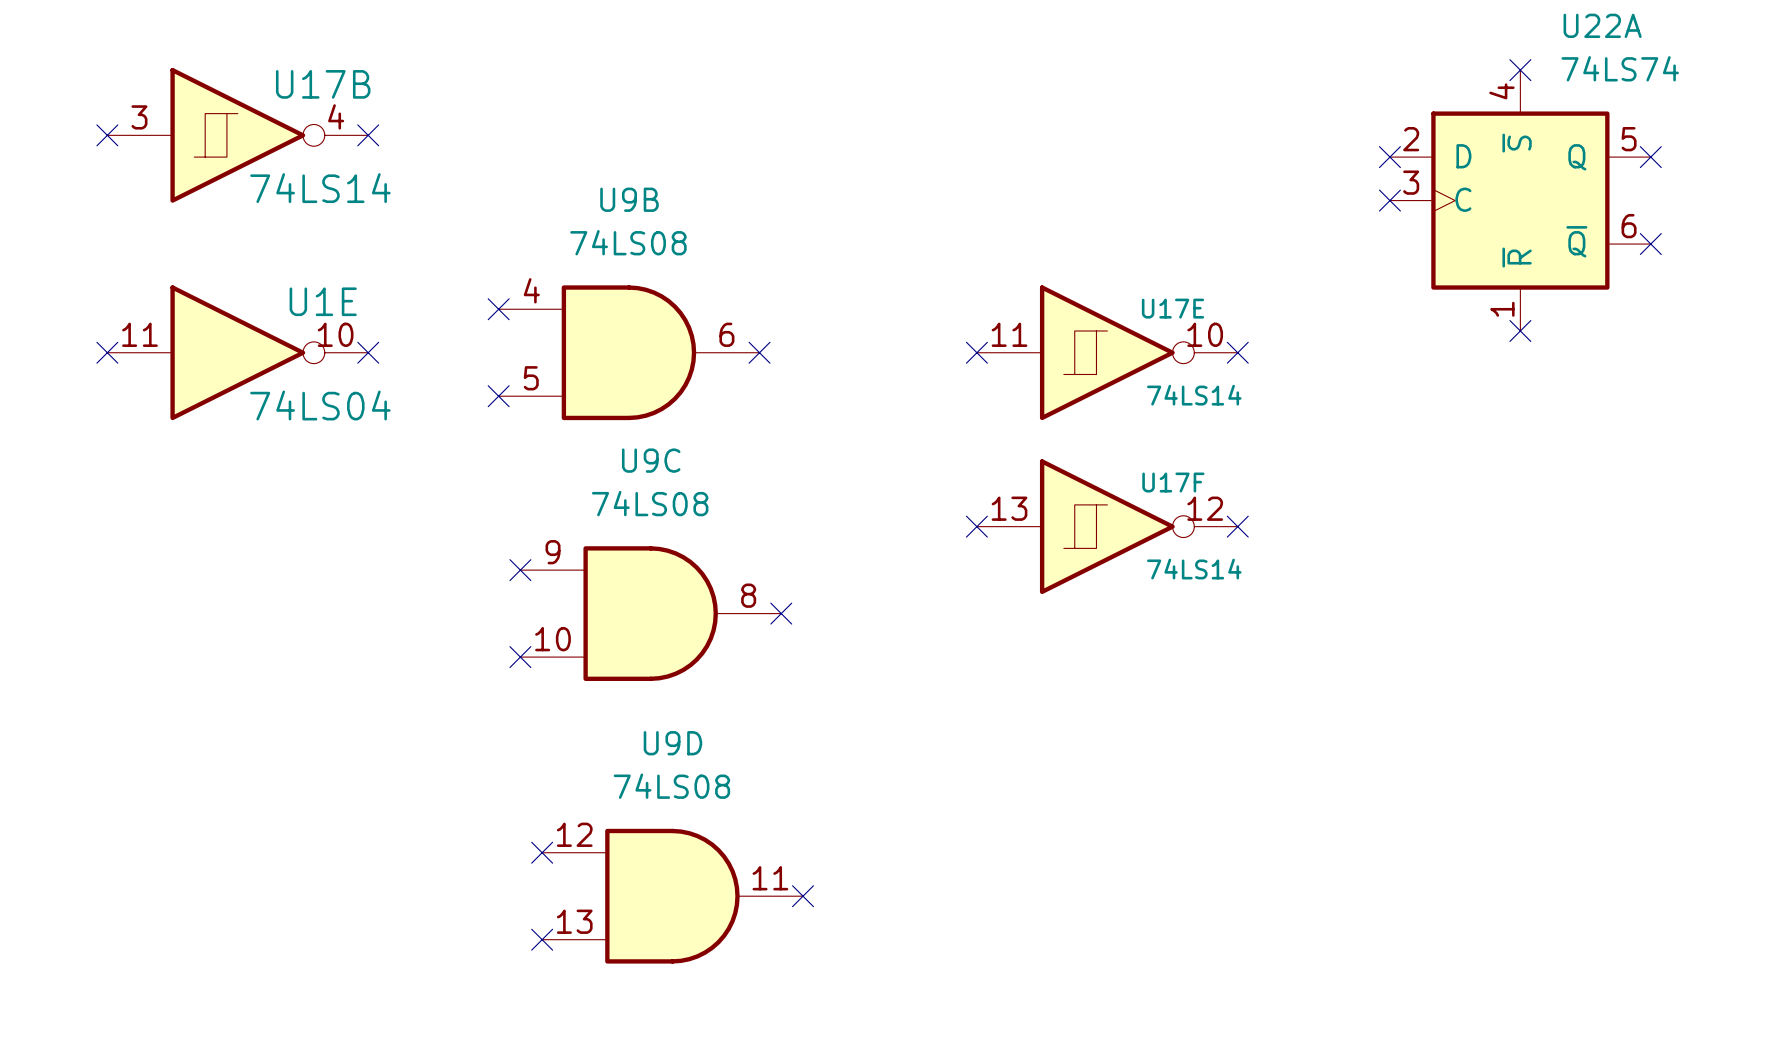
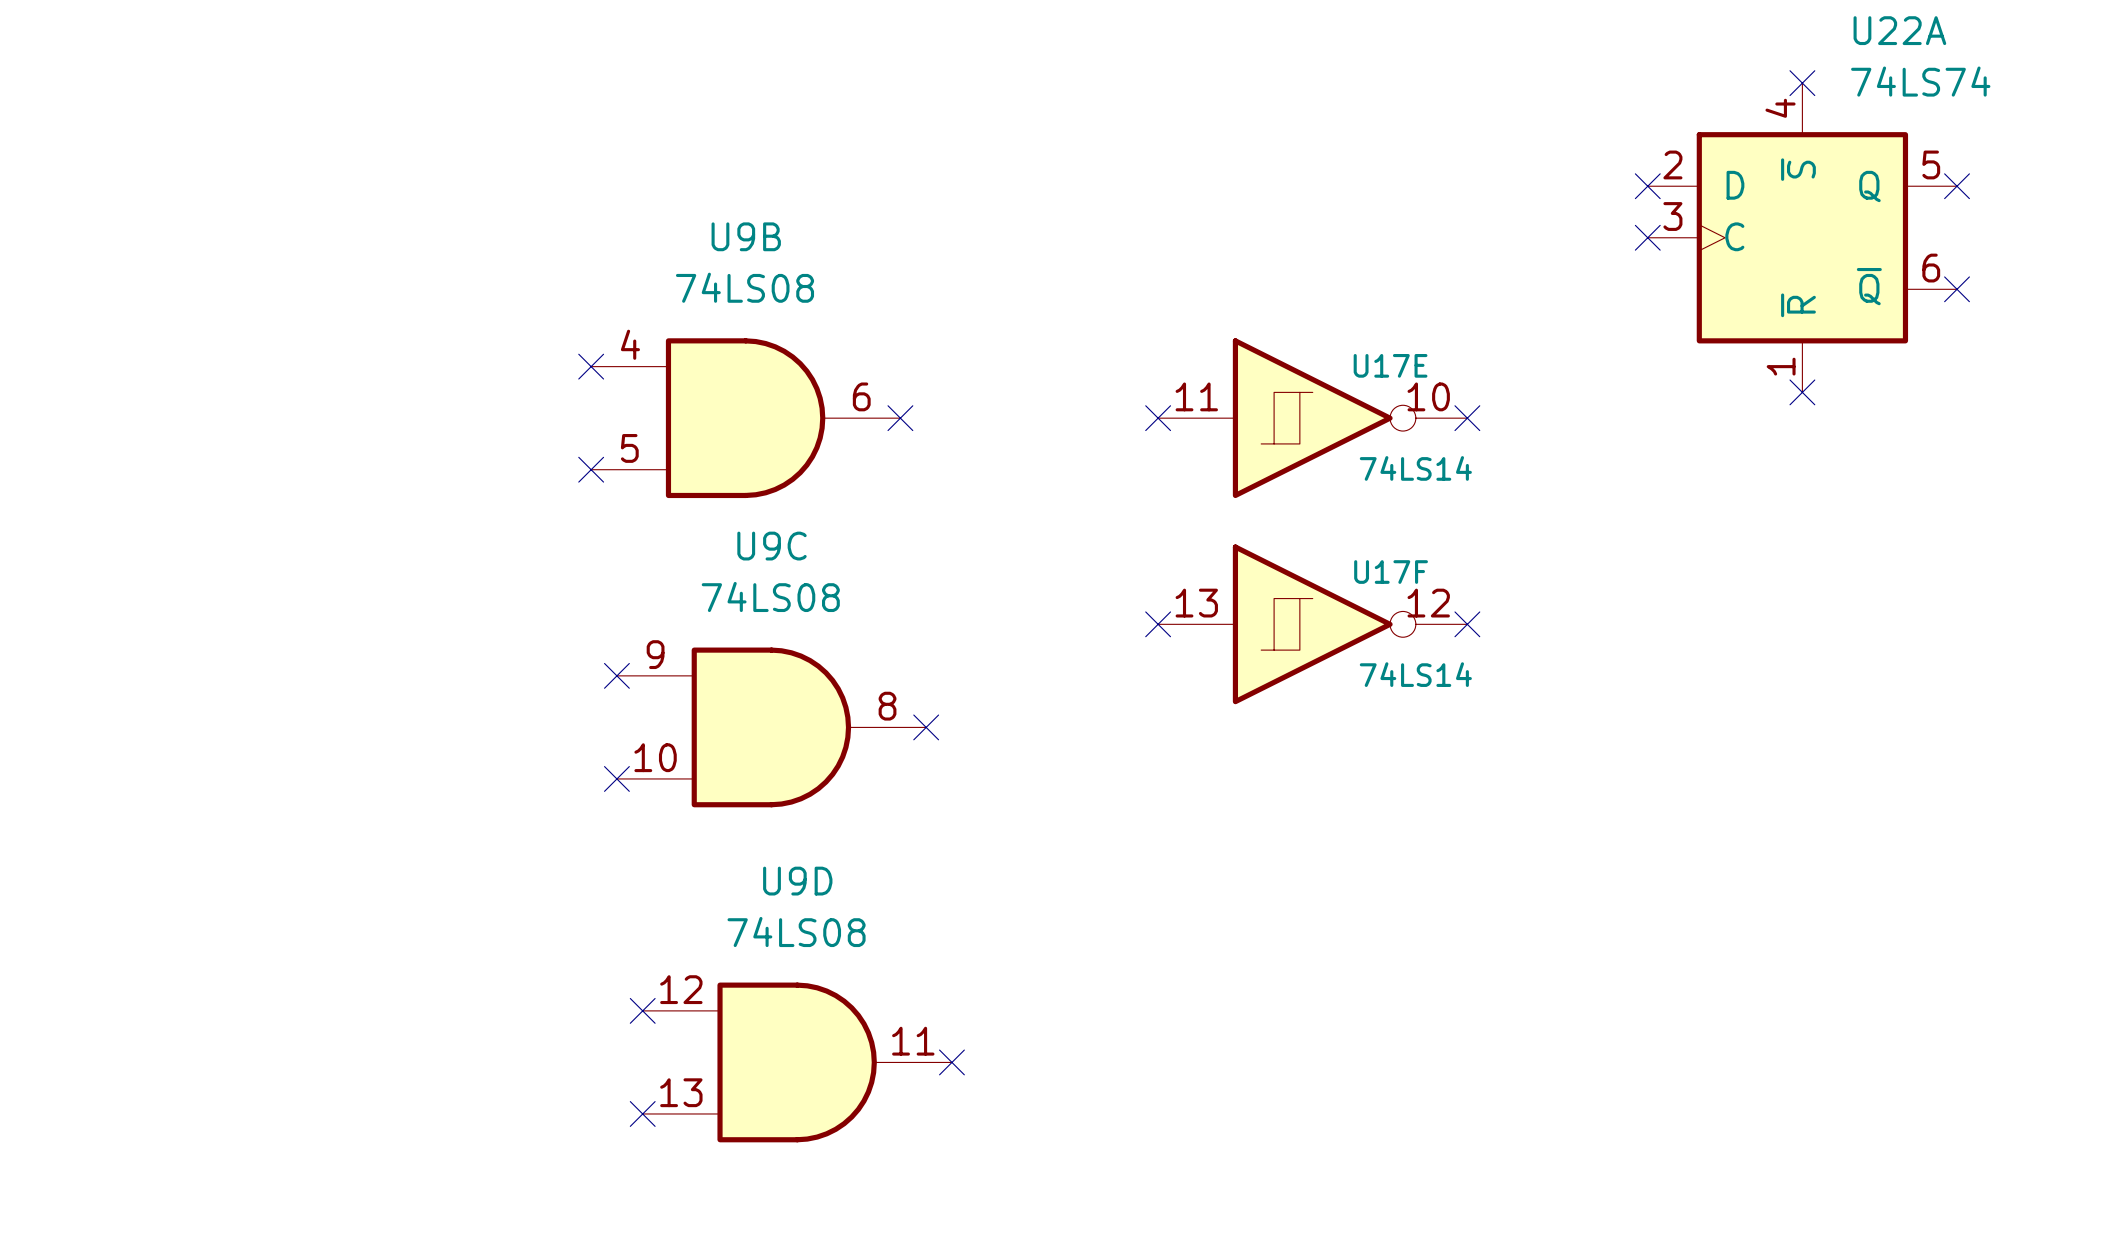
no-connect mark: (107, 135) -> none
U17B: 74LS14 (237, 135) -> none
no-connect mark: (368, 135) -> none
no-connect mark: (107, 352) -> none
U1E: 74LS04 (237, 352) -> none
no-connect mark: (368, 352) -> none

